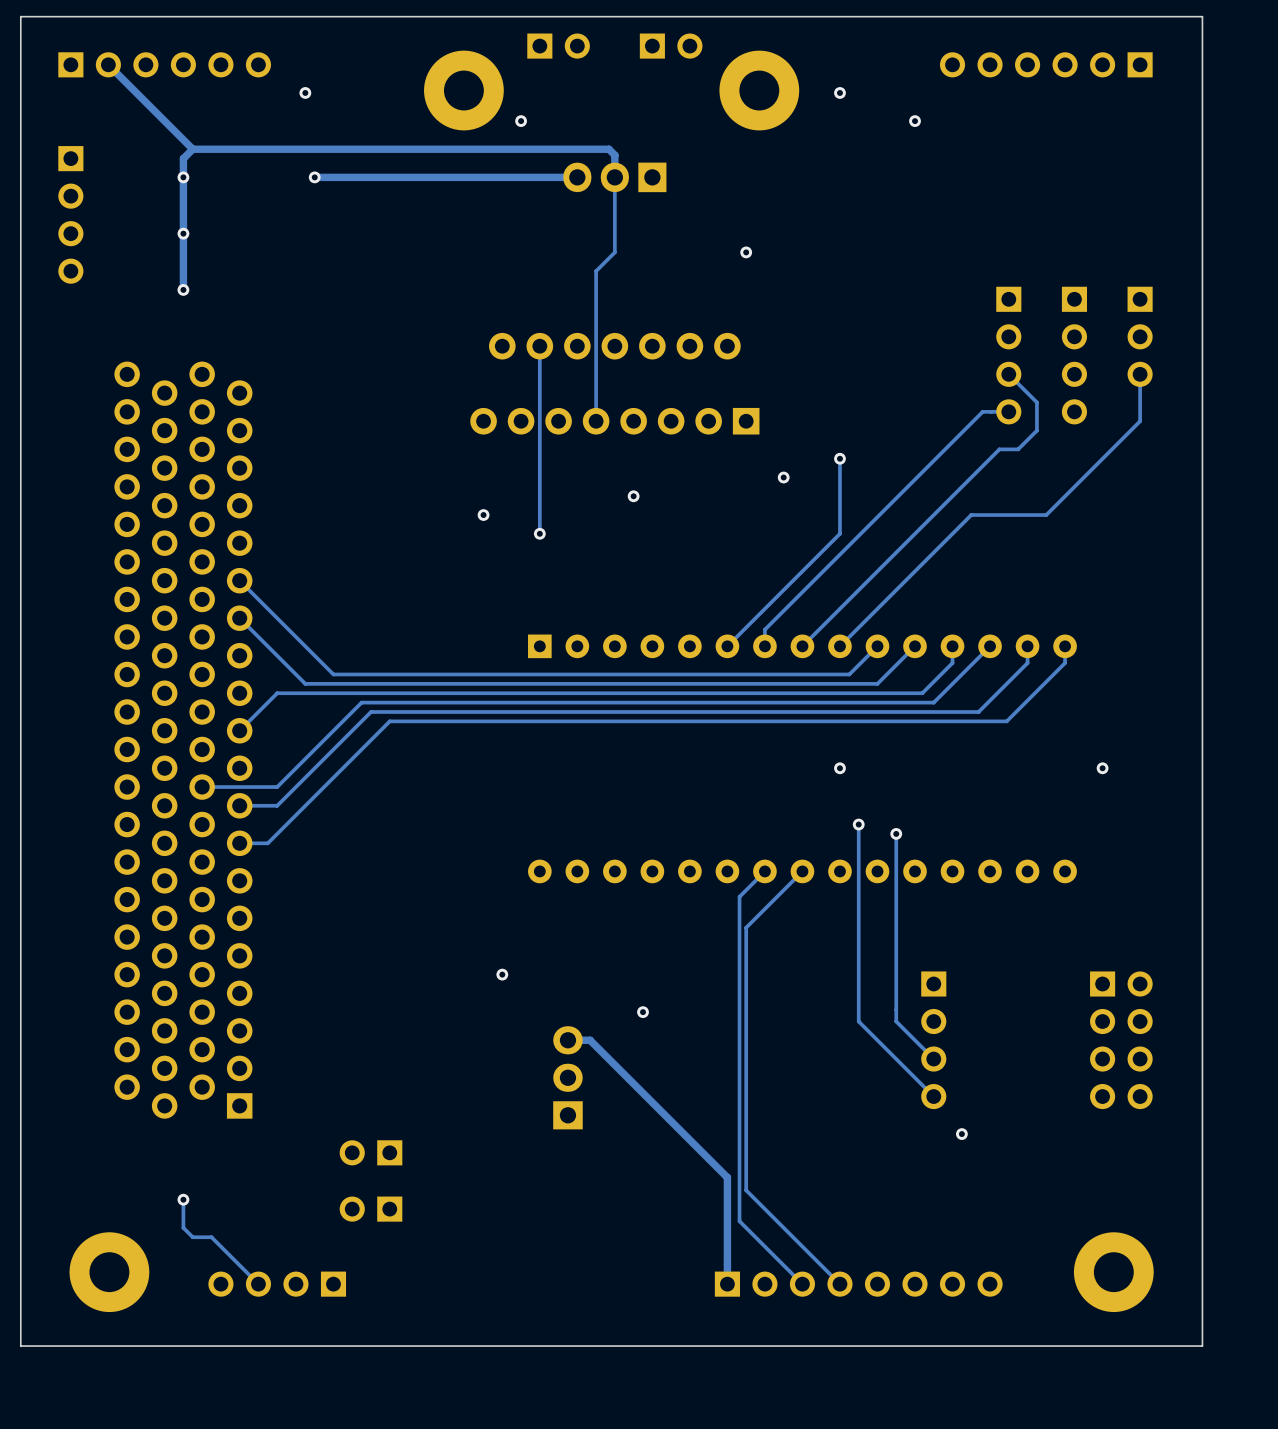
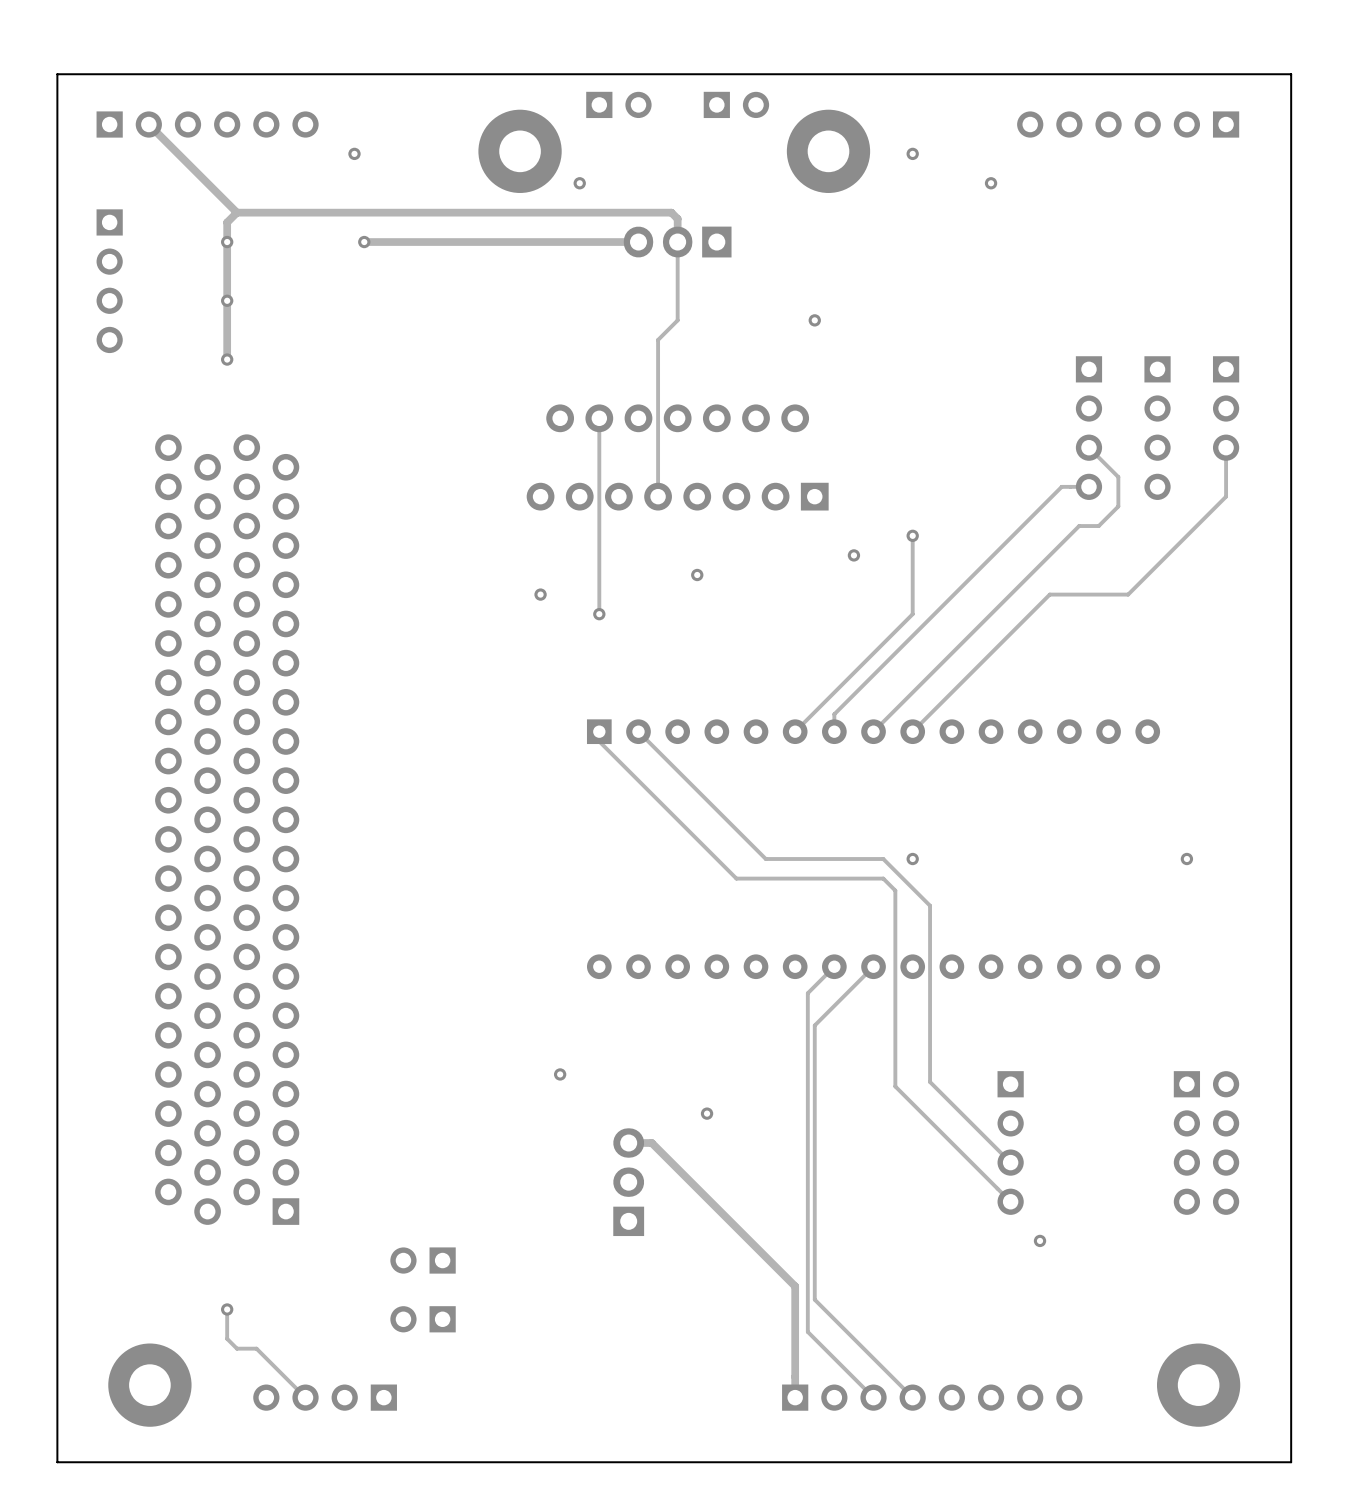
track: (239, 580) (333, 674) (849, 674) (877, 646) -> none
track: (239, 618) (305, 683) (877, 683) (915, 646) -> none
track: (952, 646) (952, 663) (922, 693) (277, 693) (239, 730) -> none
track: (990, 646) (933, 702) (361, 702) (277, 787) (202, 787) -> none
track: (1027, 646) (1027, 663) (978, 711) (371, 711) (277, 805) (239, 805) -> none
track: (1065, 646) (1065, 663) (1006, 721) (389, 721) (267, 843) (239, 843) -> none
track: (858, 824) (858, 1021) -> (599, 731) (599, 741) (736, 878) (883, 878) (895, 890) (895, 1086) (932, 1123)
via: (858, 824) -> none
track: (896, 833) (896, 1021) -> (638, 731) (765, 859) (883, 859) (930, 905) (930, 1082) (971, 1123)
via: (896, 833) -> none

